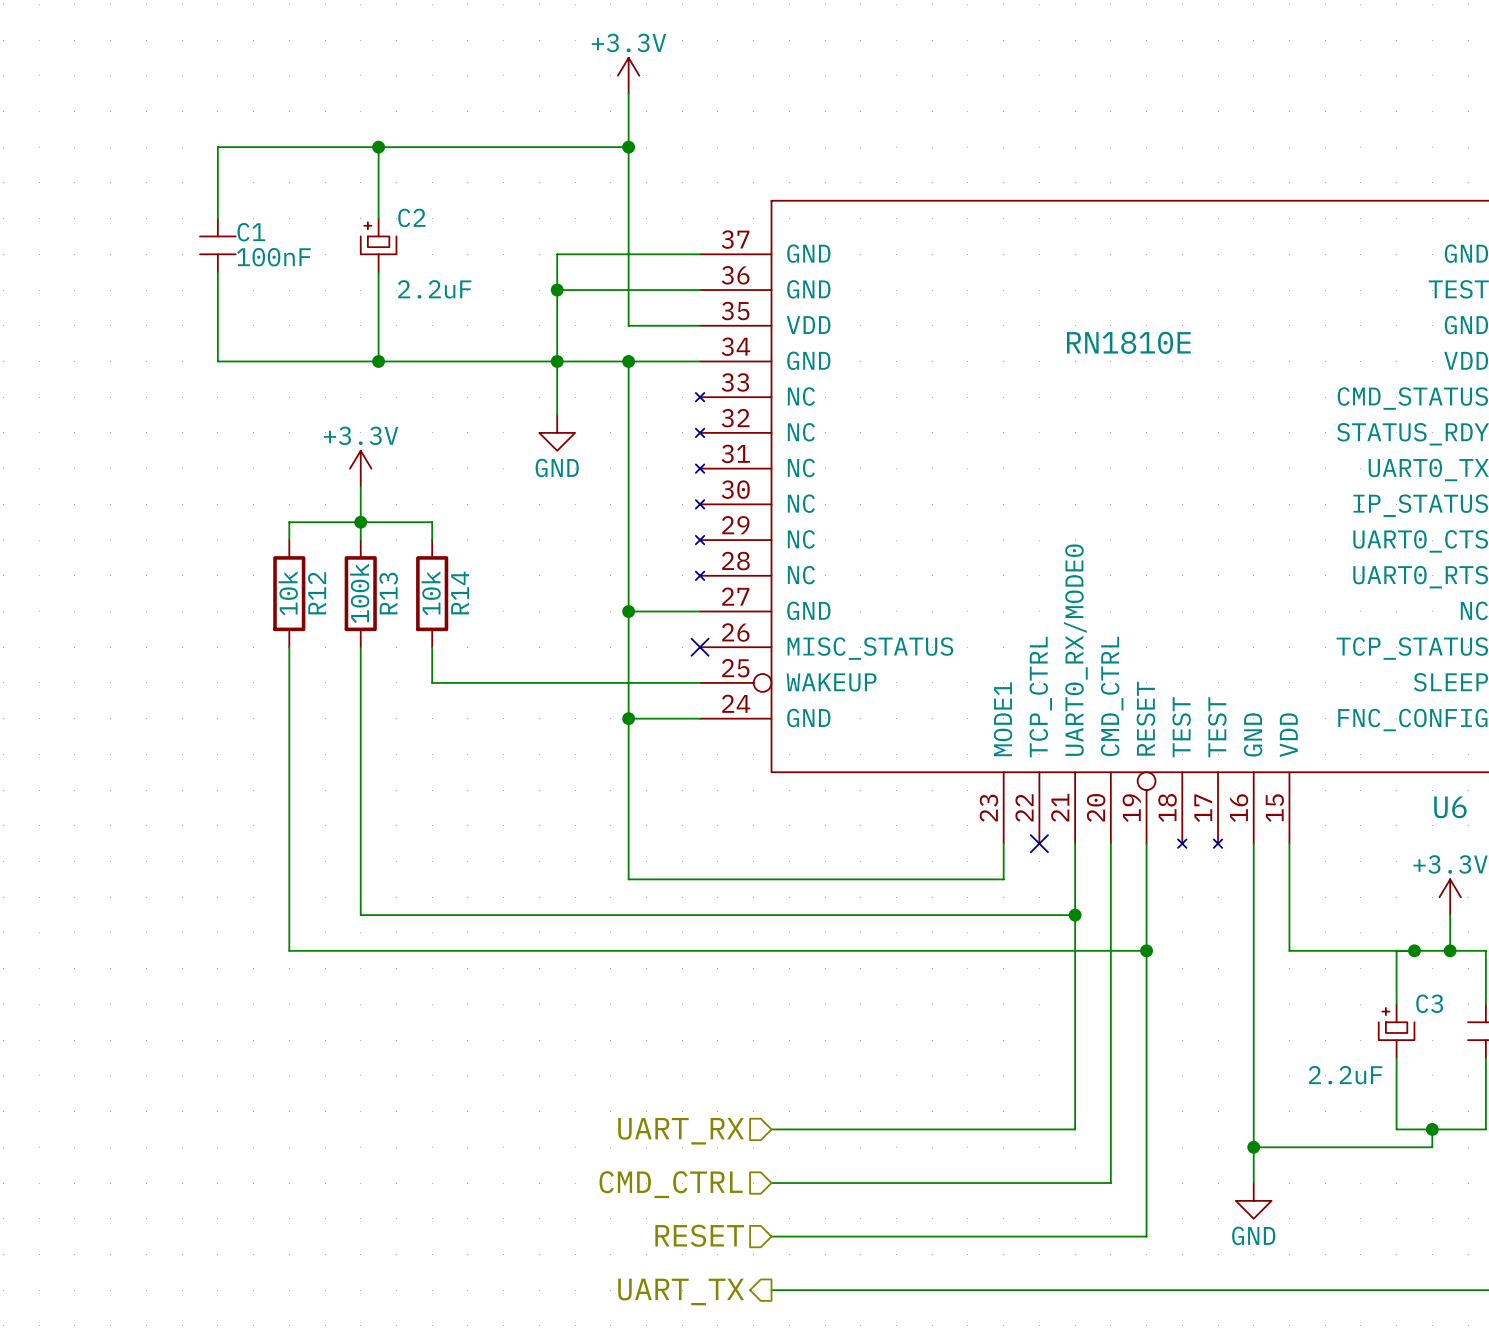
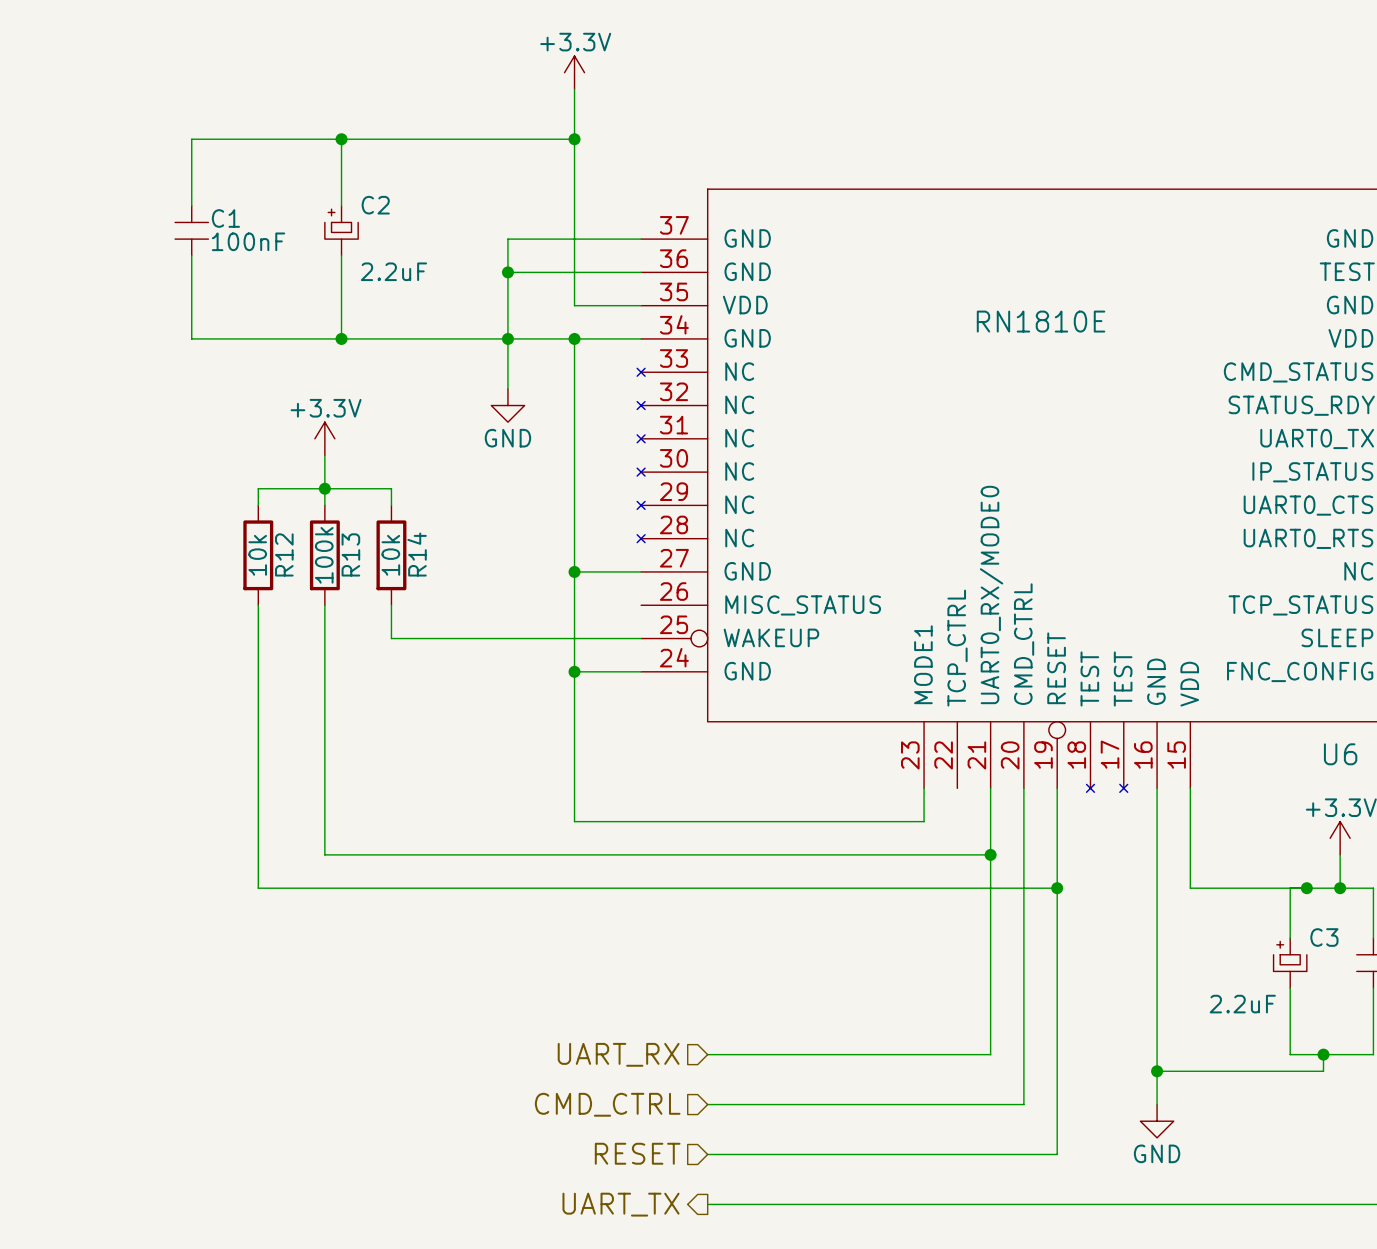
no-connect mark: (700, 647) -> none
no-connect mark: (1039, 843) -> none

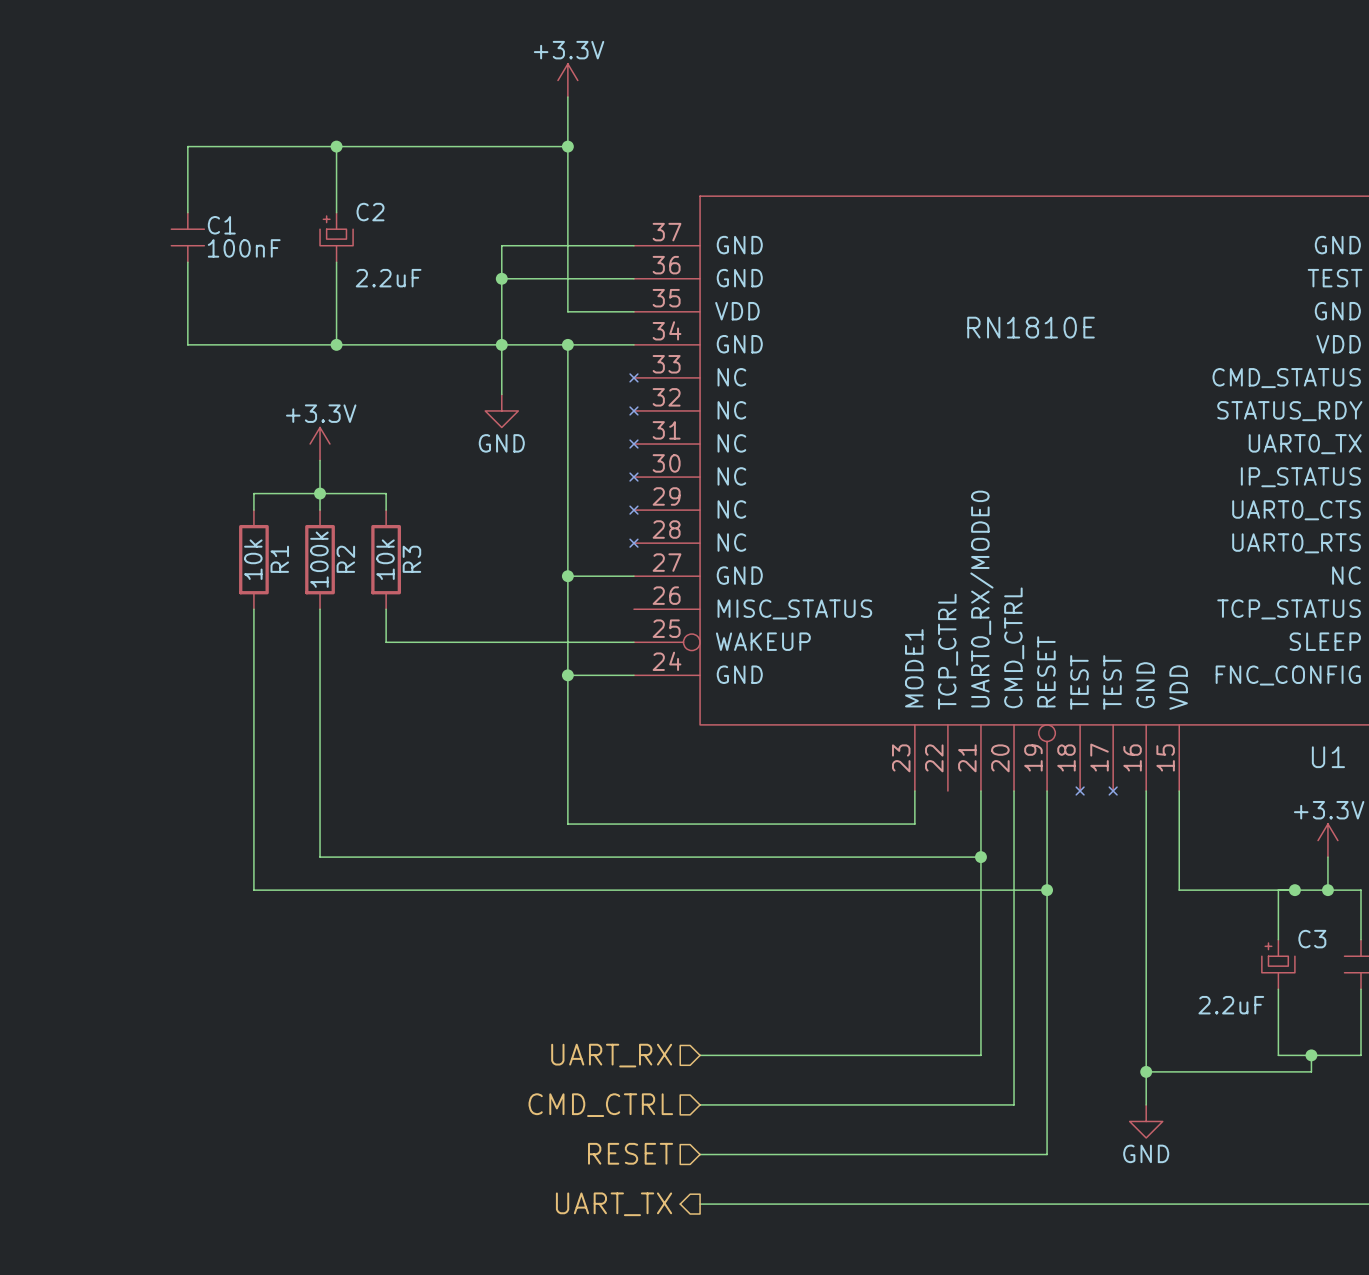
R12 name: R12 (284, 554) -> R1 (279, 559)
R13 name: R13 (350, 554) -> R2 (345, 559)
R14 name: R14 (417, 554) -> R3 (411, 559)
U6 name: U6 (1340, 754) -> U1 (1328, 757)

